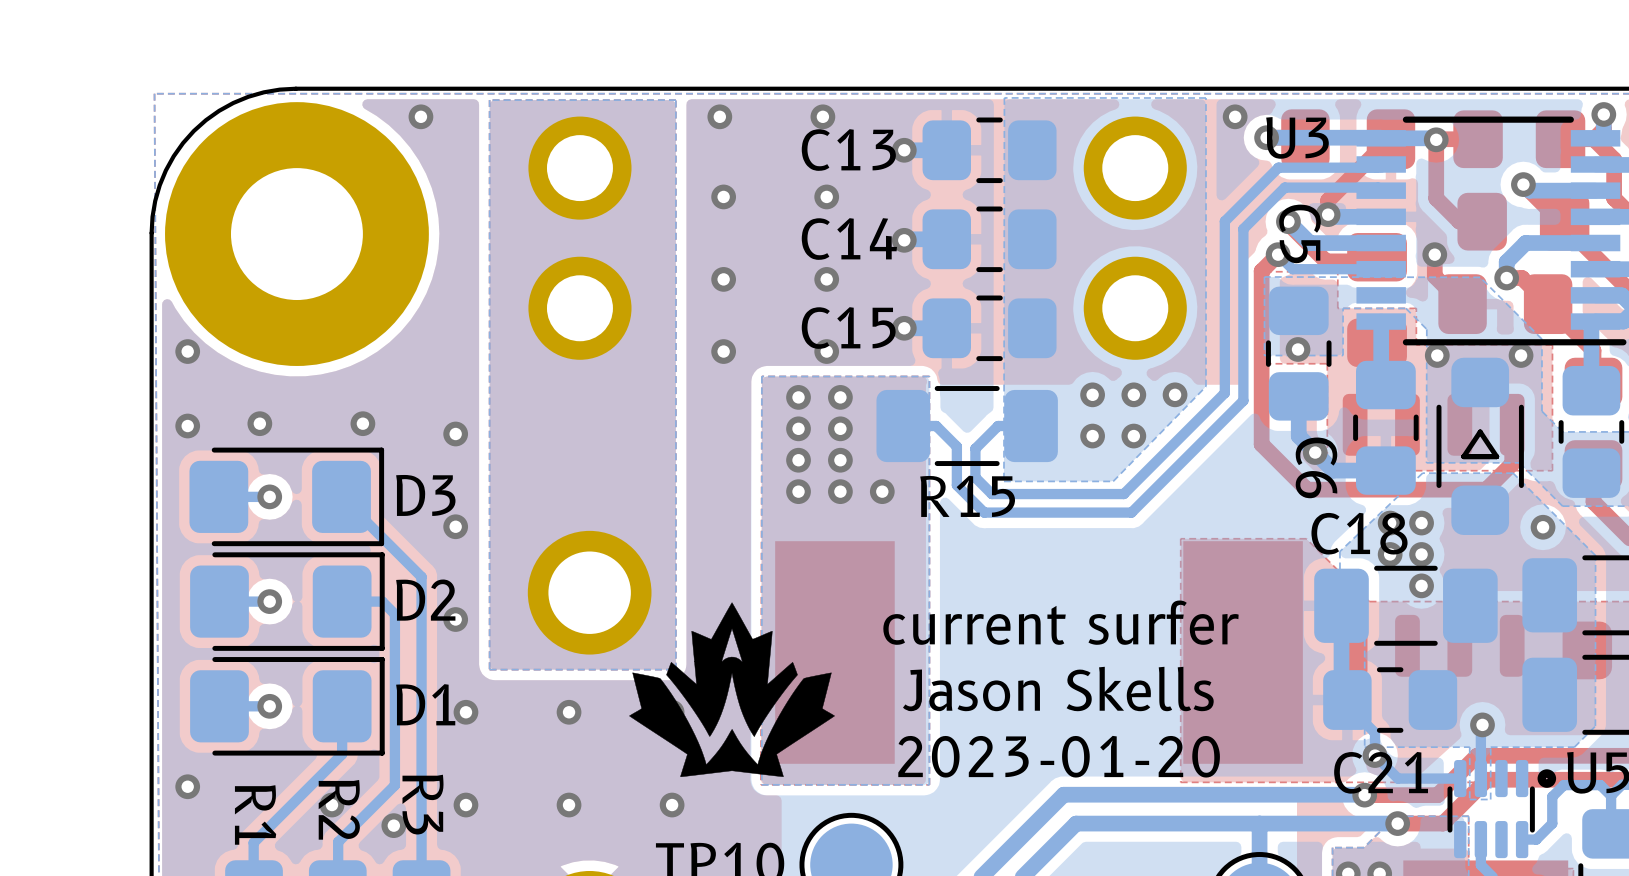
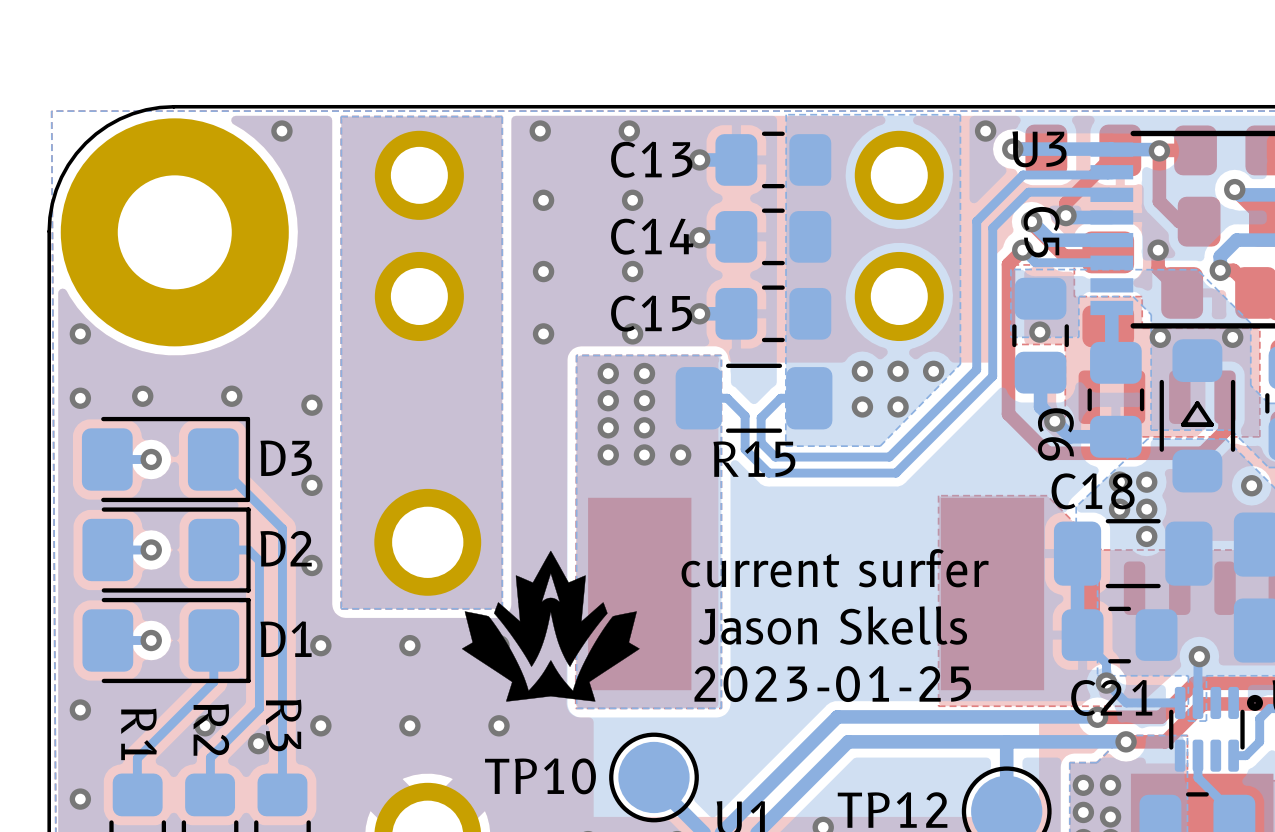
text: 2023-01-20 (1059, 756) -> 2023-01-25 (832, 684)

